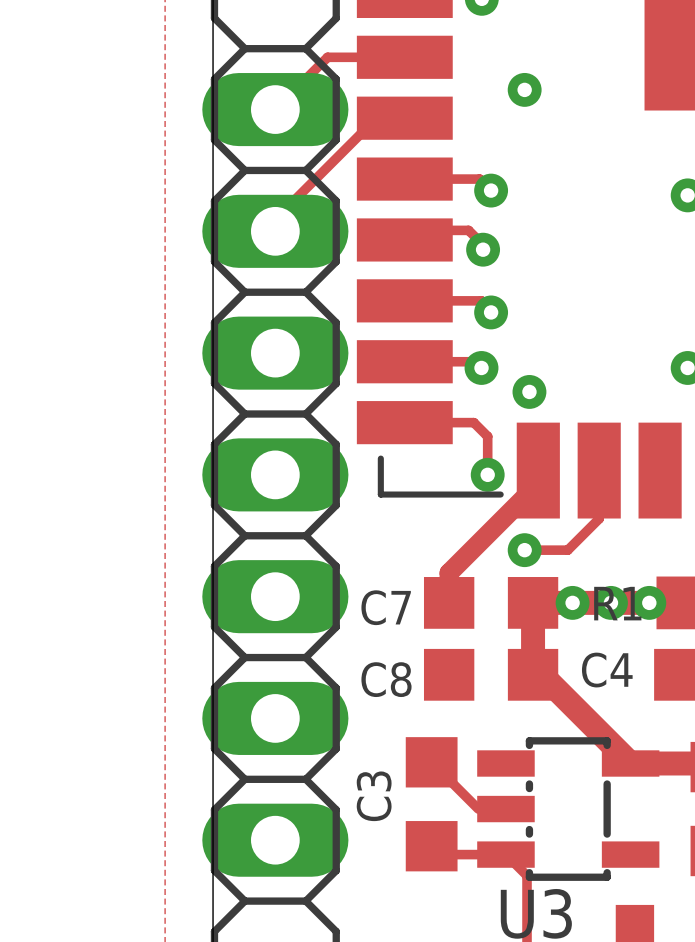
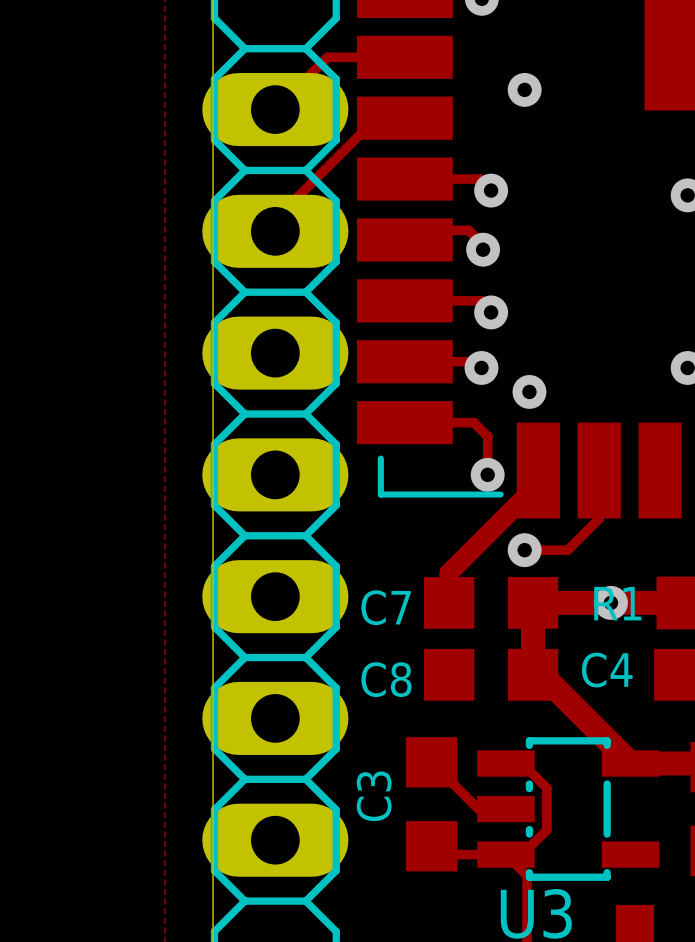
via: (572, 602) -> none
via: (649, 602) -> none
track: none -> (505, 763) (522, 763) (546, 788) (546, 830) (514, 862)

